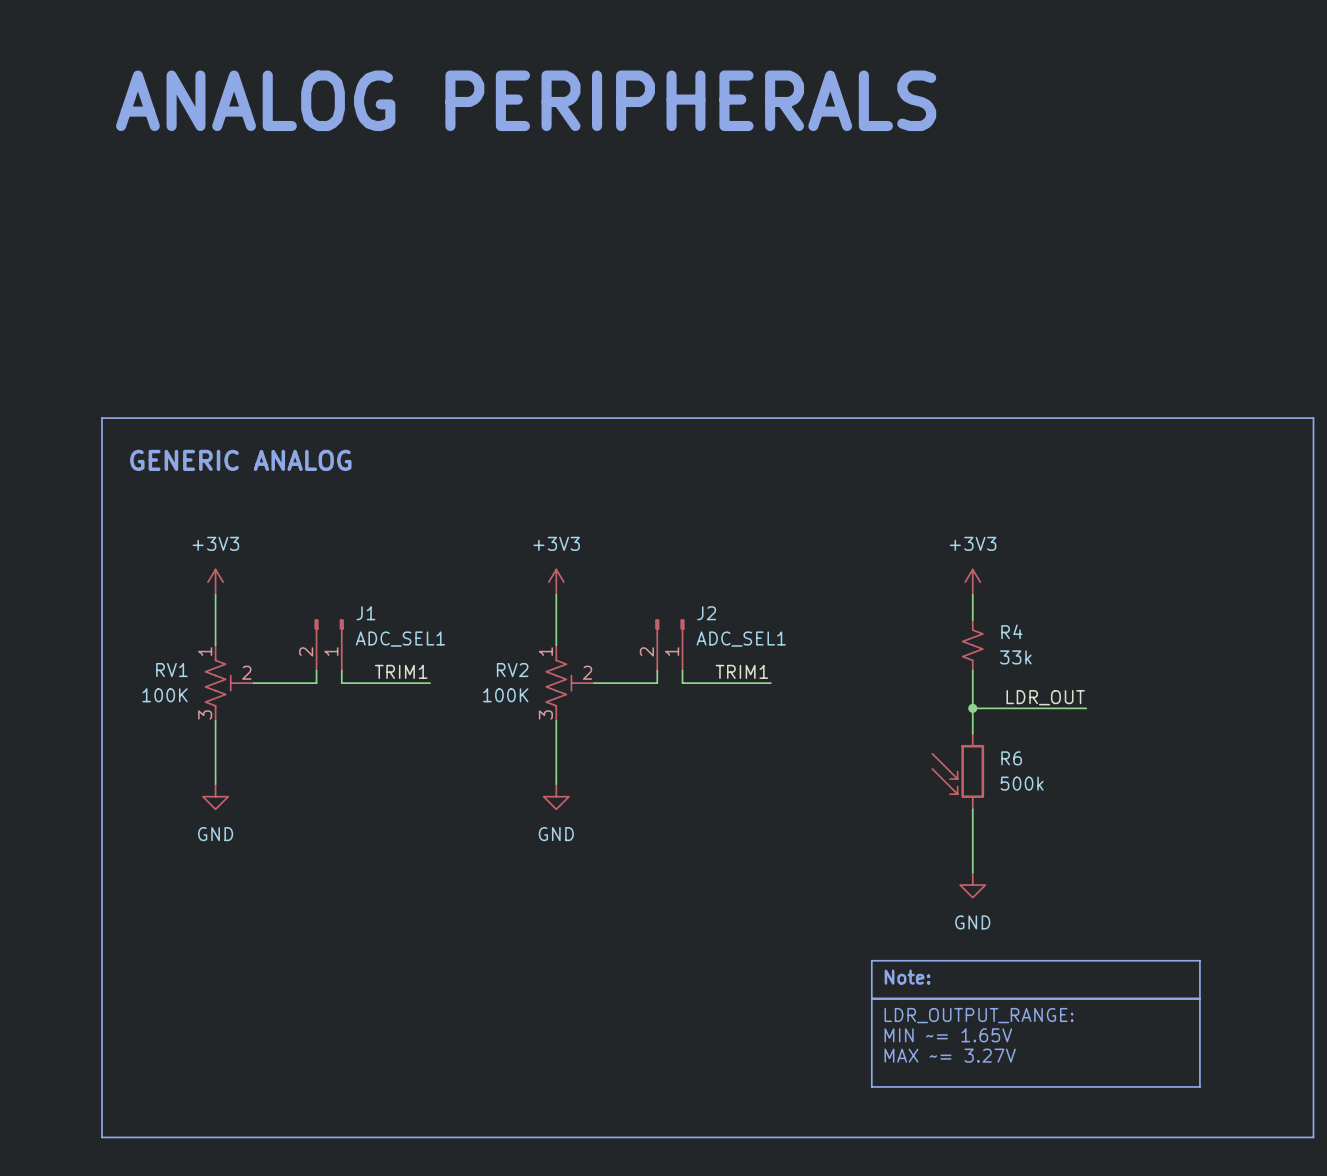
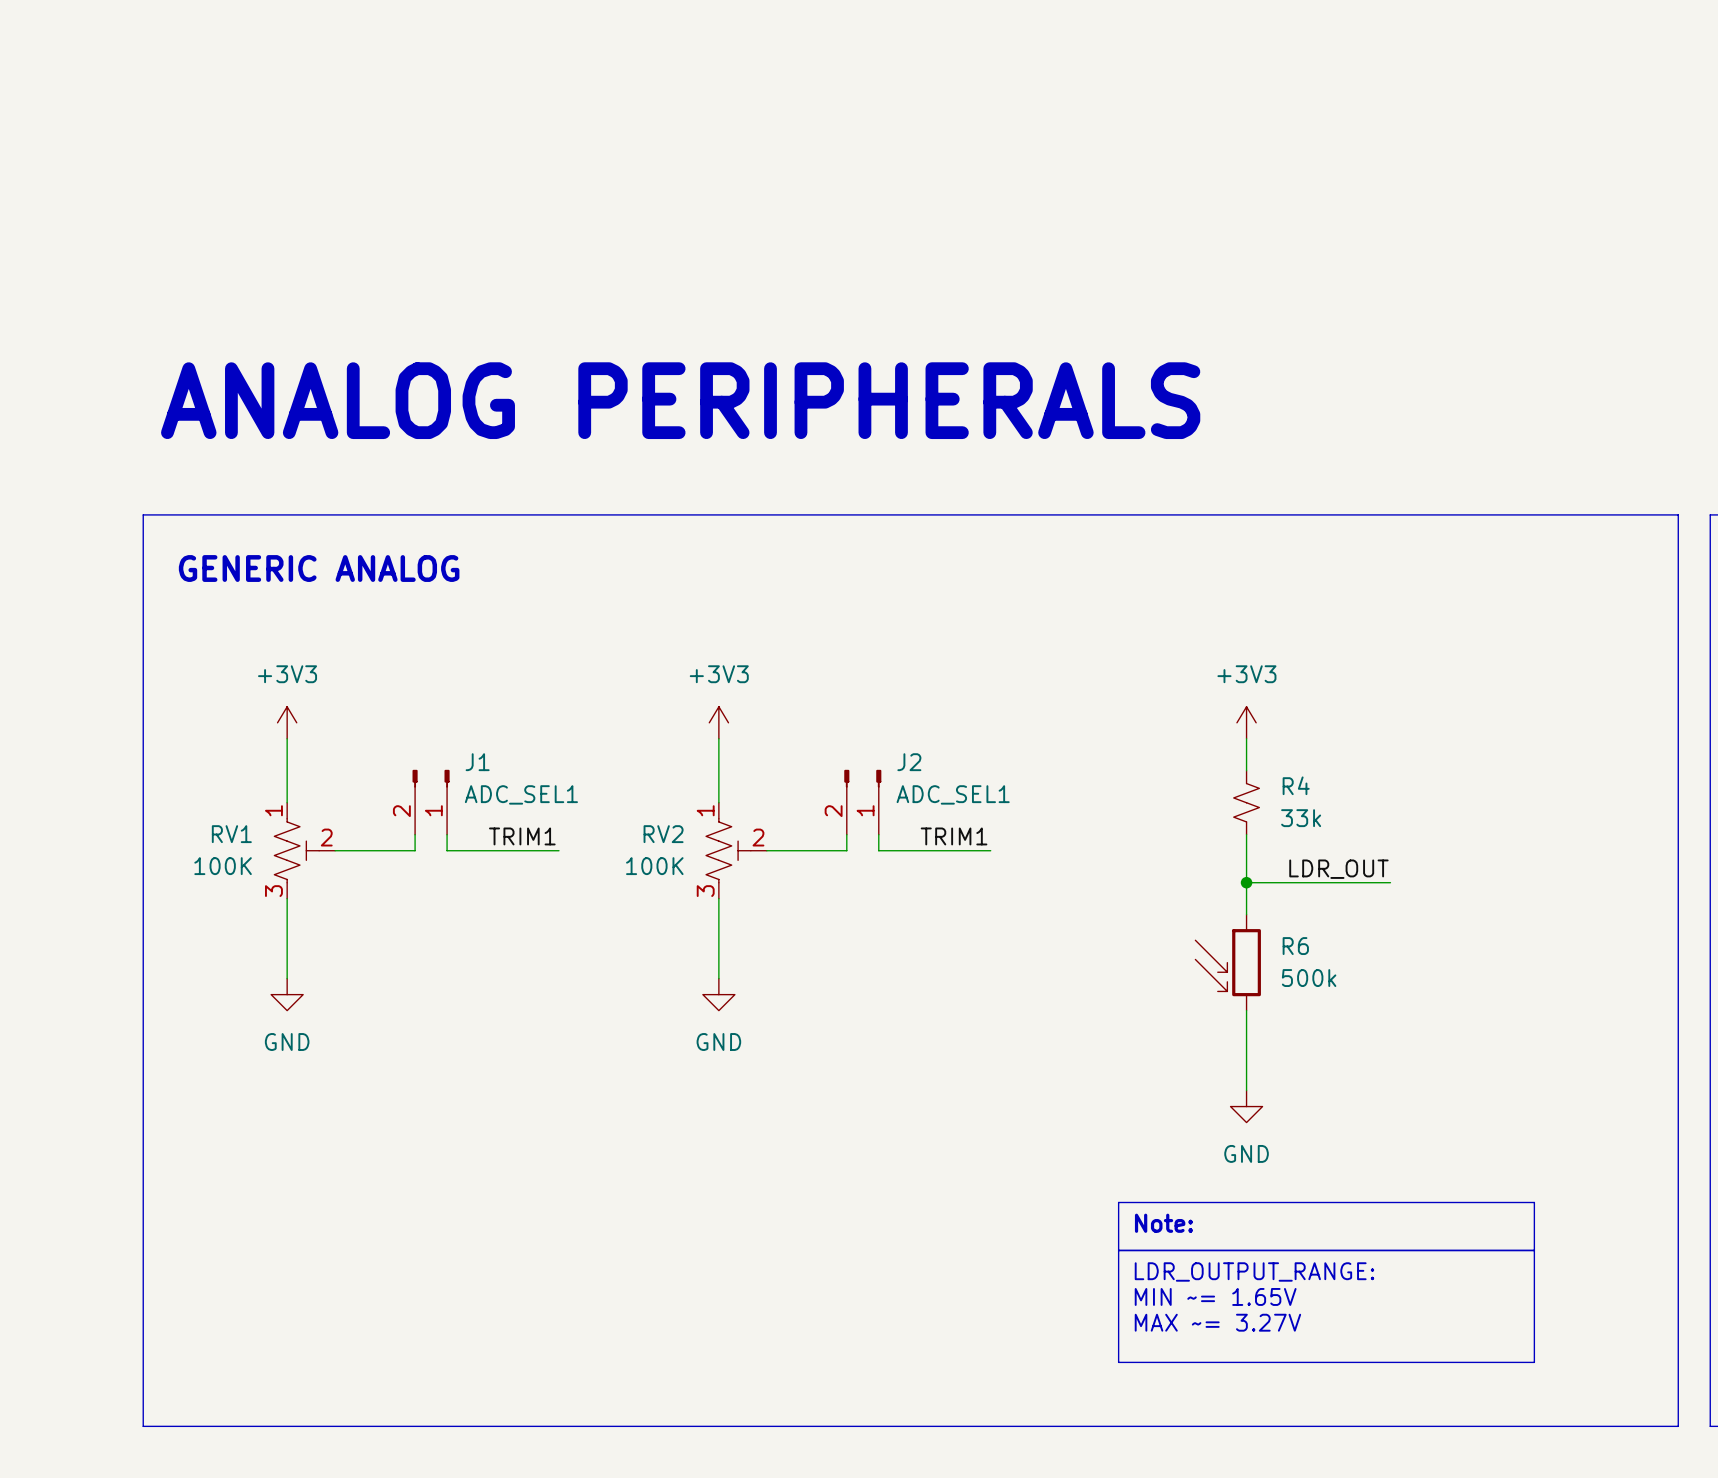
text position: ANALOG PERIPHERALS (526, 100) -> ANALOG PERIPHERALS (680, 400)

